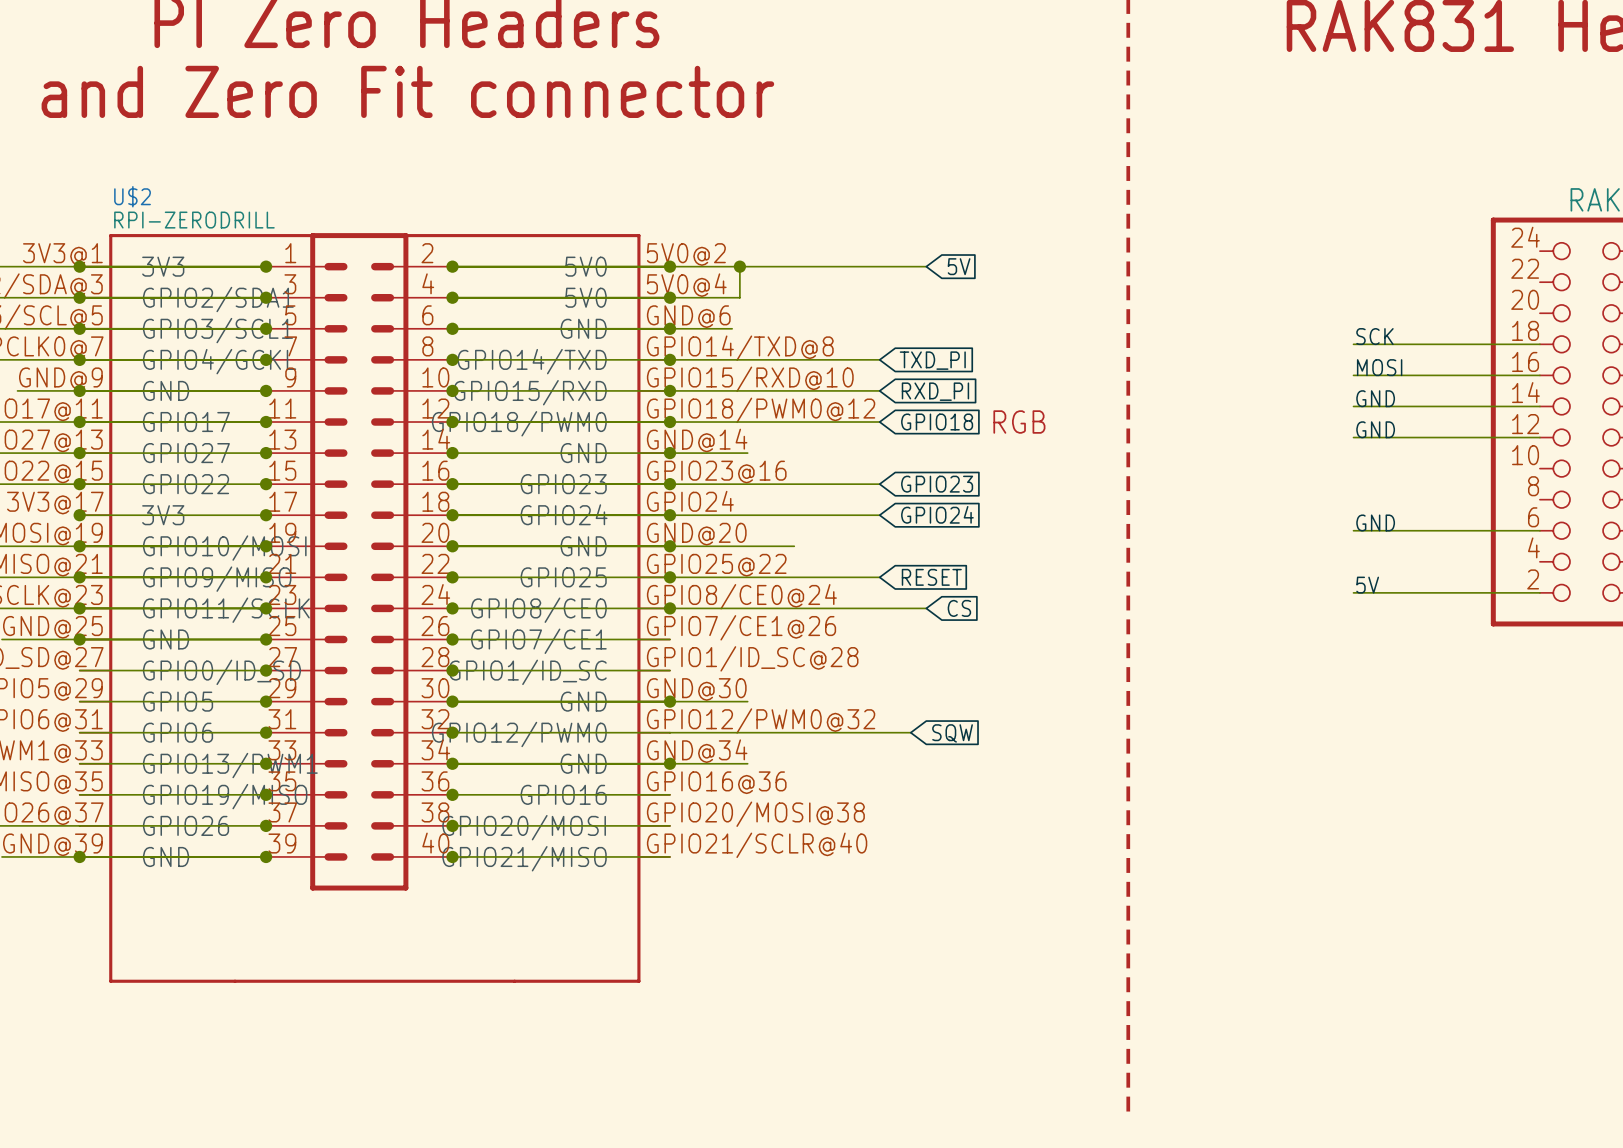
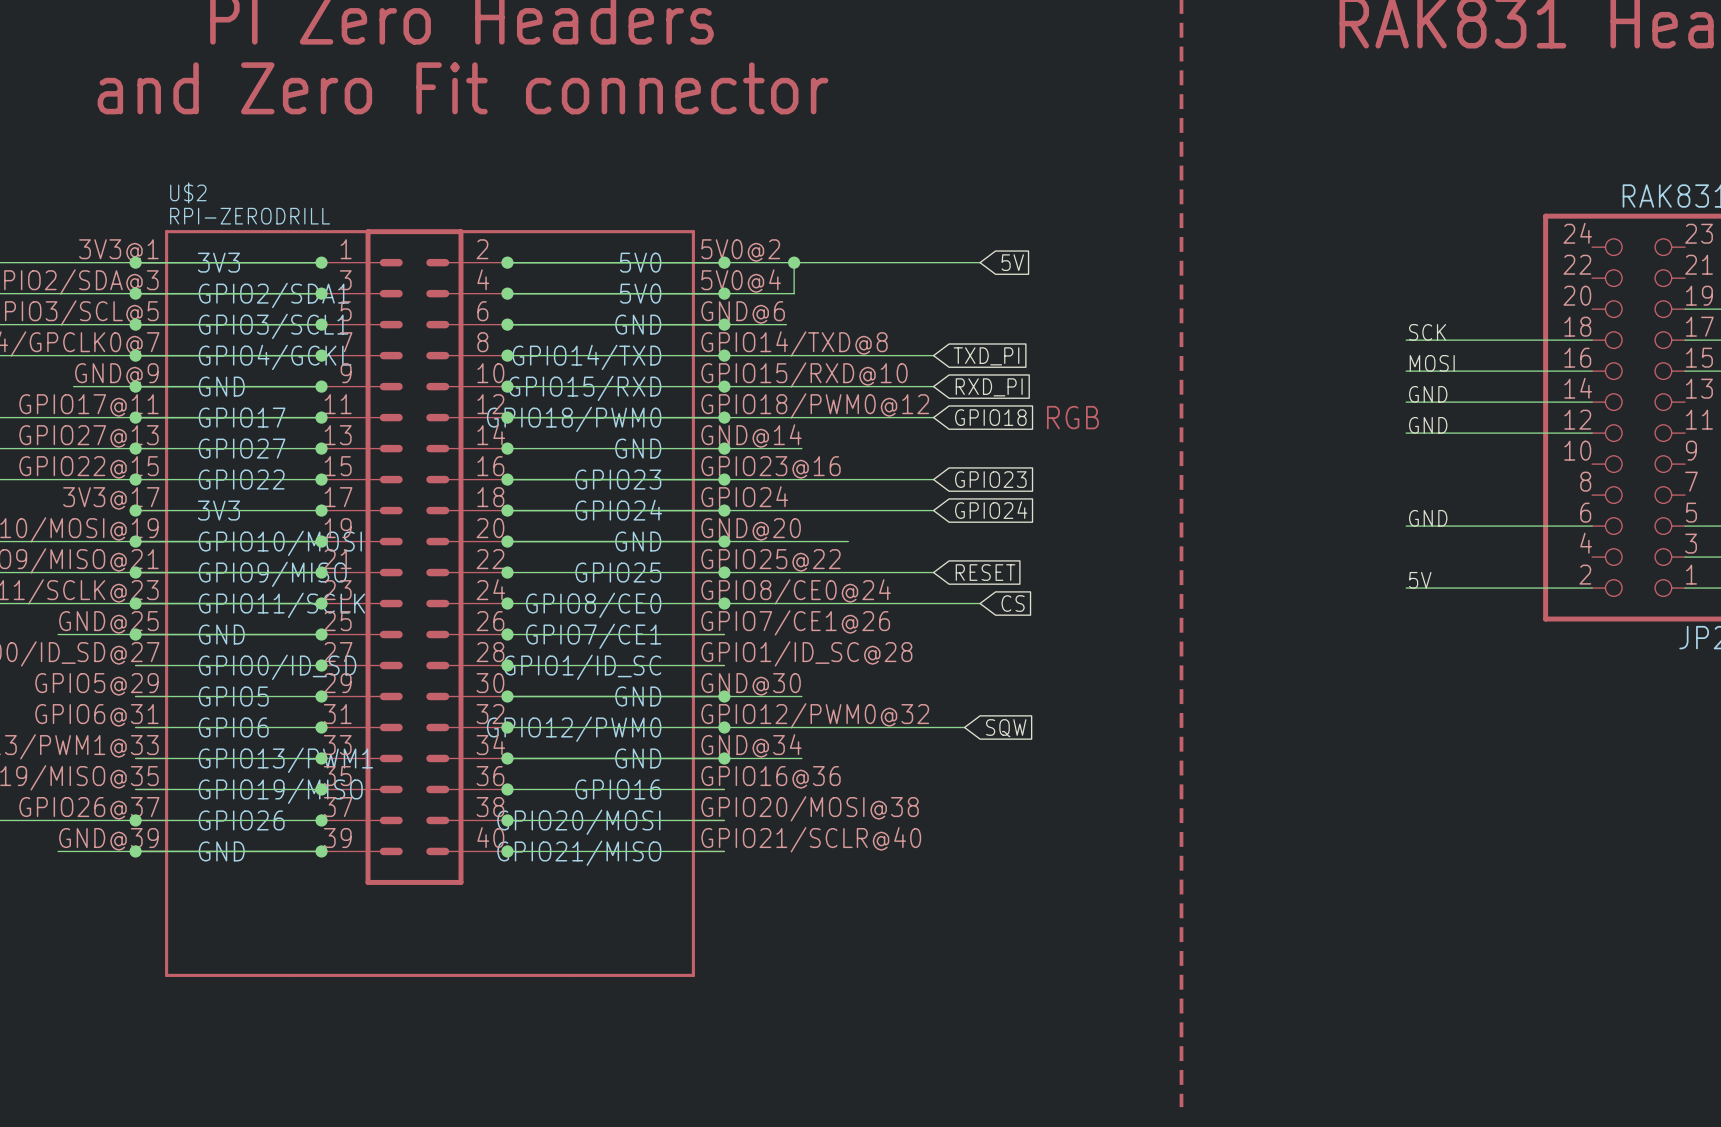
junction: none -> (724, 727)
junction: none -> (135, 820)

